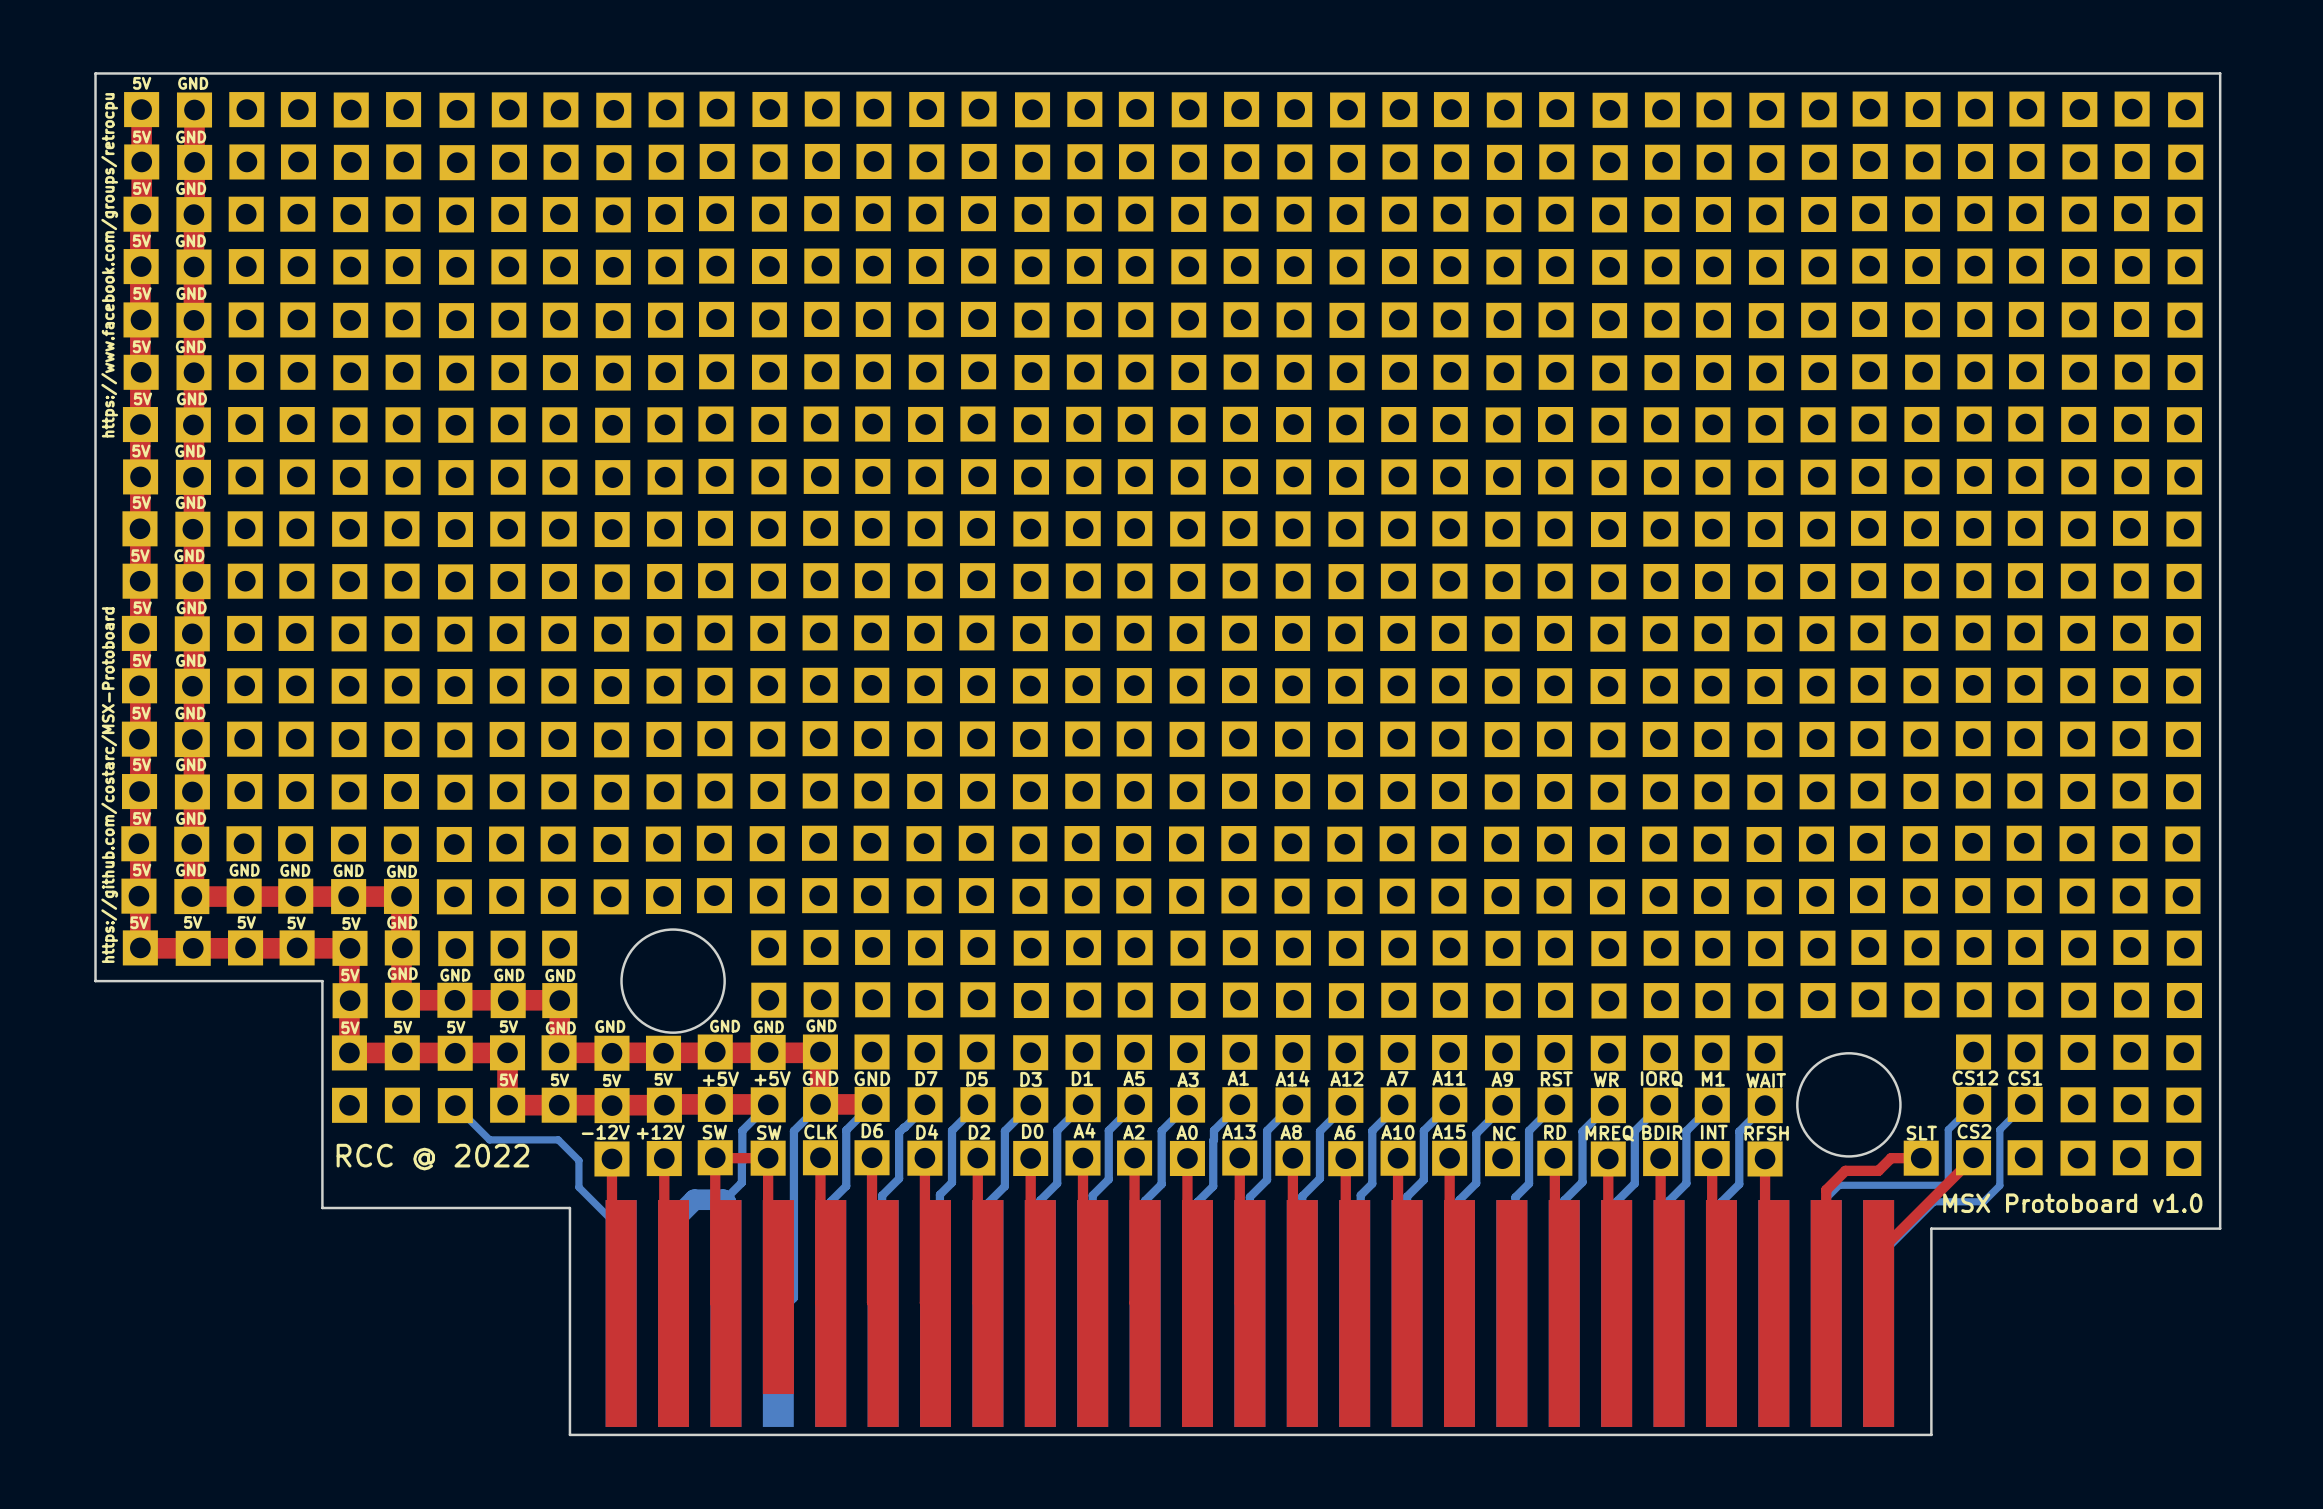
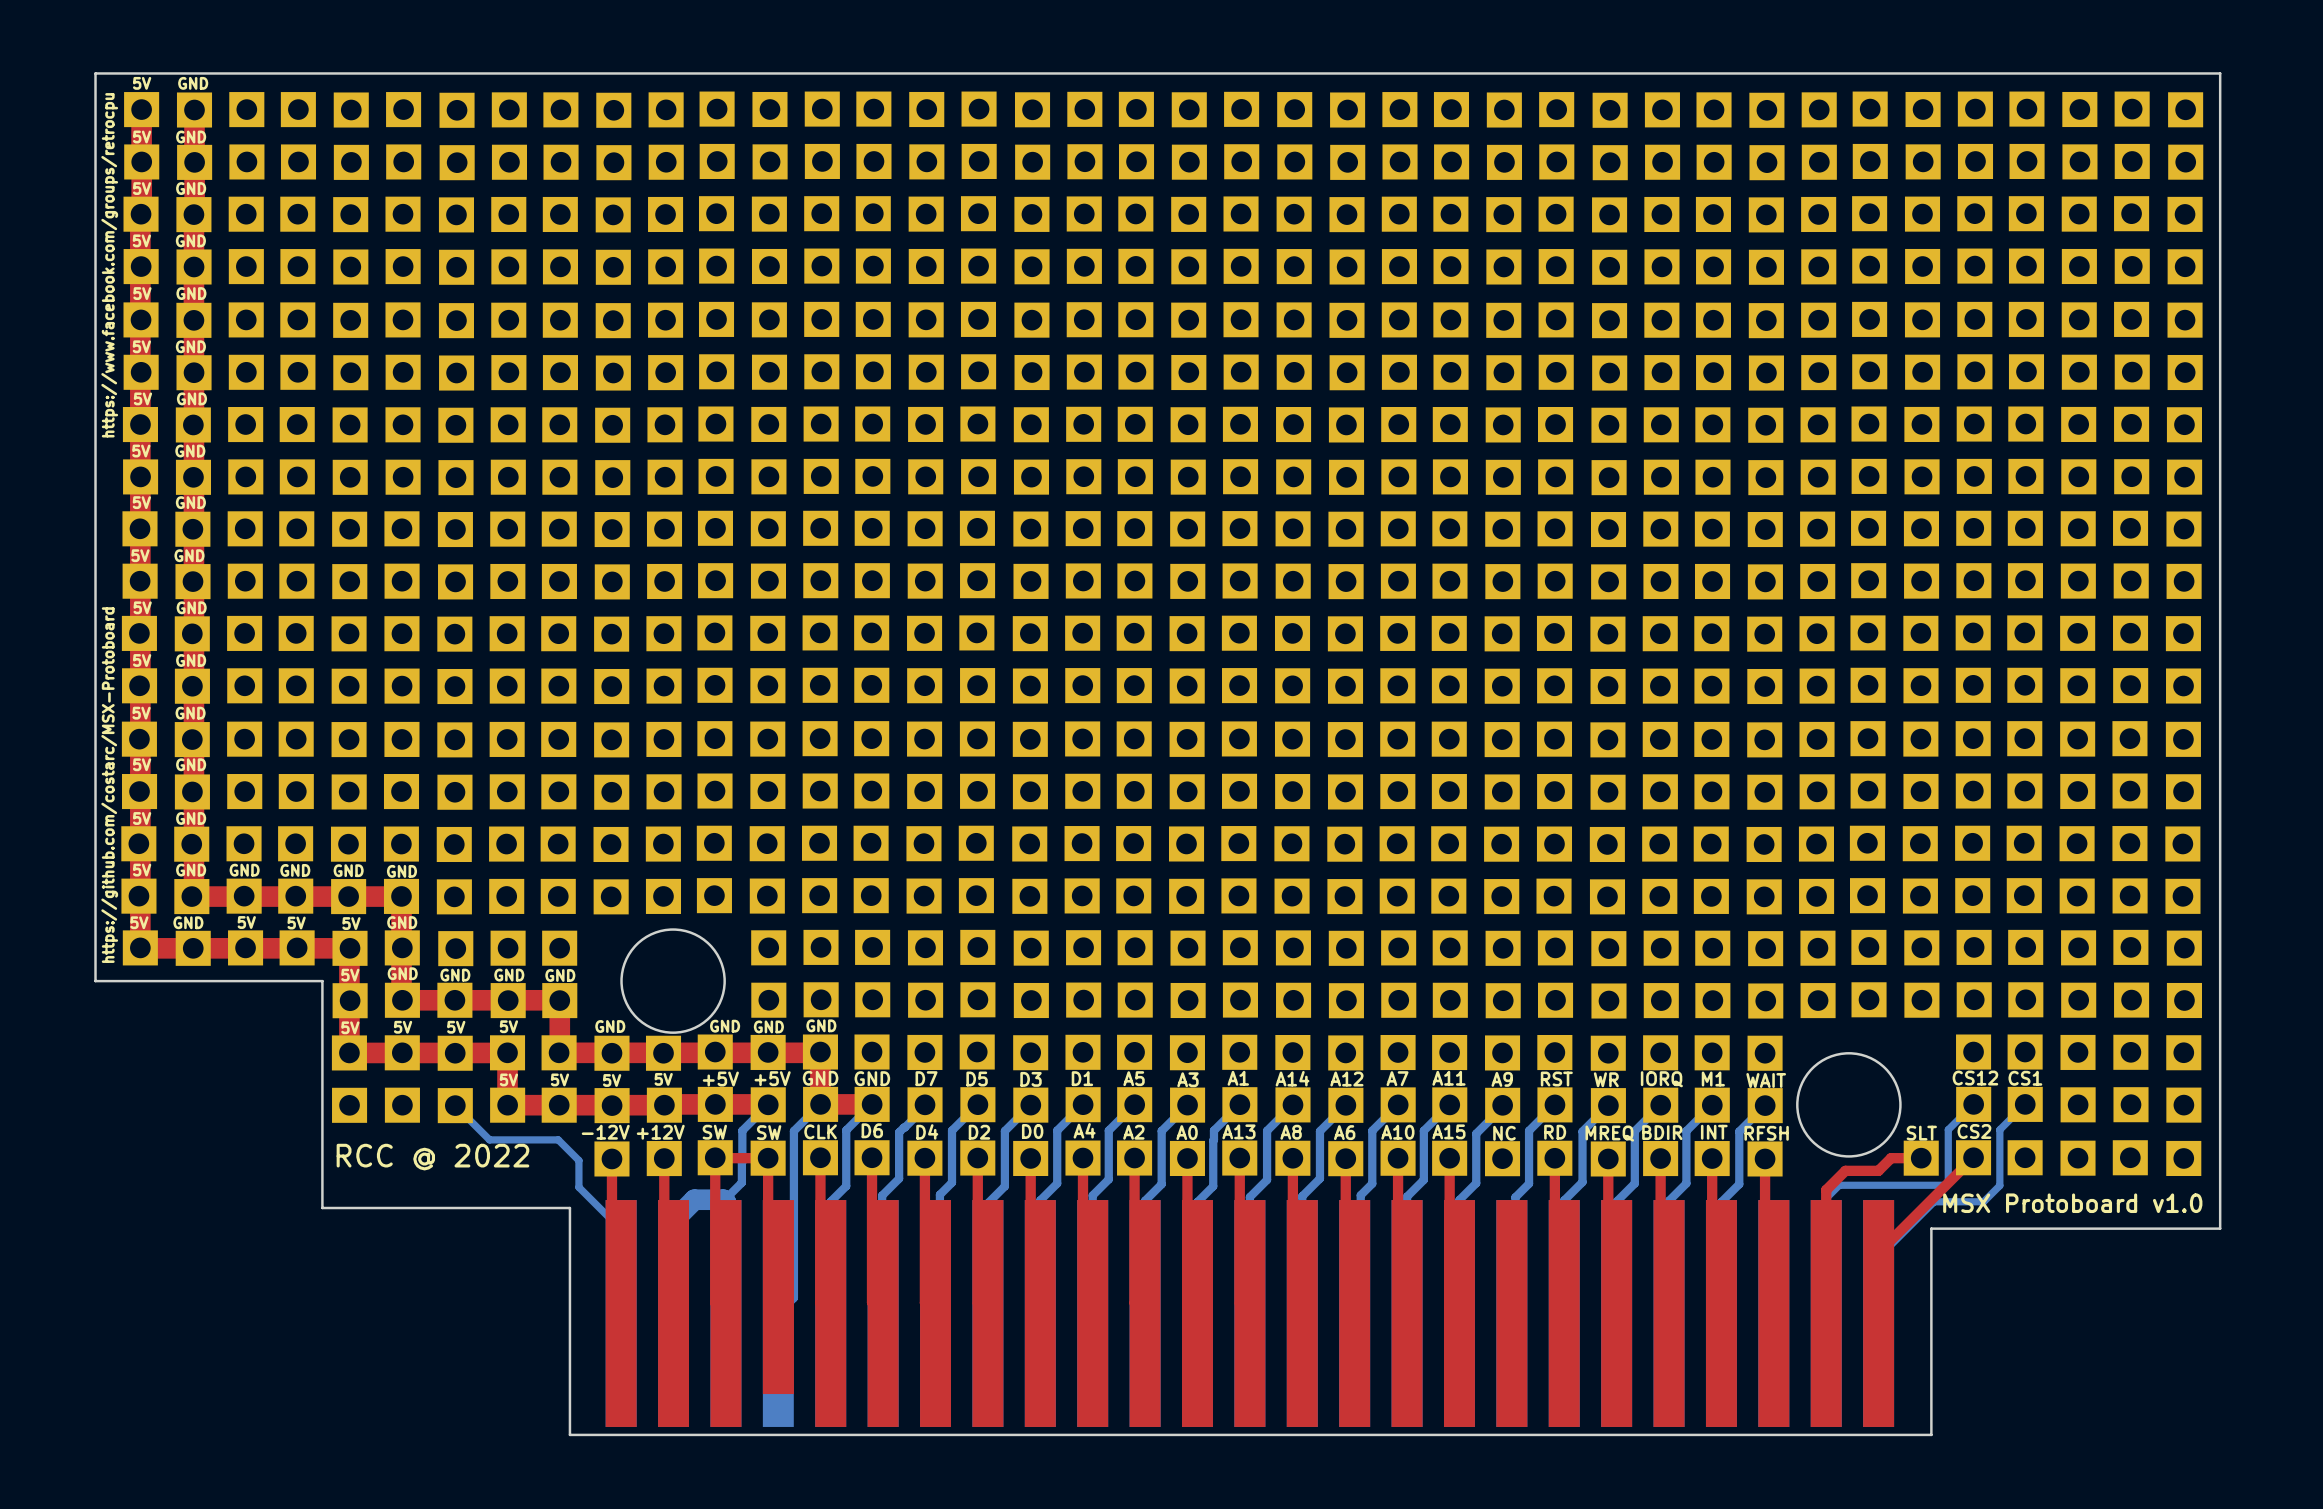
text: 5V (193, 922) -> none
text position: GND (560, 1027) -> GND (188, 922)

